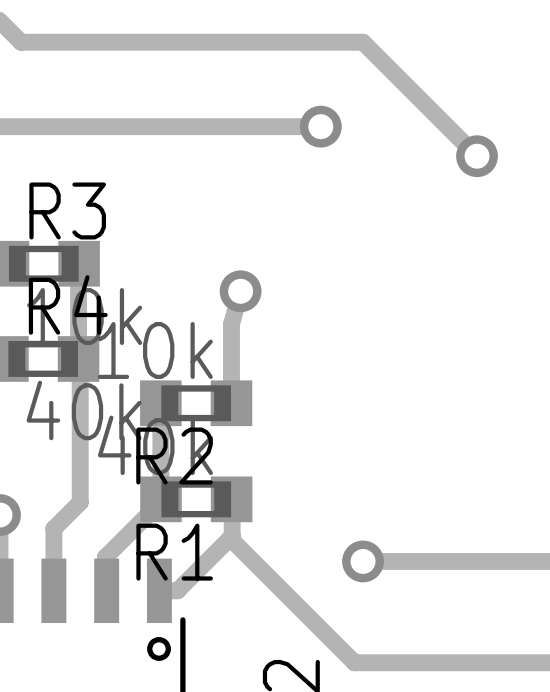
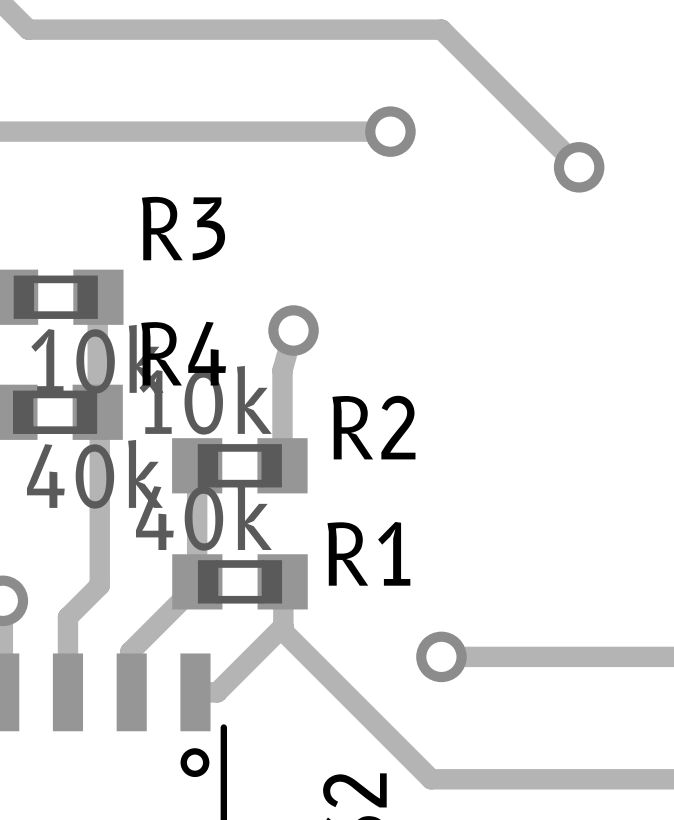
R3 name position: R3 (67, 210) -> R3 (183, 228)
R4 name position: R4 (68, 304) -> R4 (183, 353)
R2 name position: R2 (174, 456) -> R2 (373, 427)
R1 name position: R1 (174, 552) -> R1 (368, 553)

